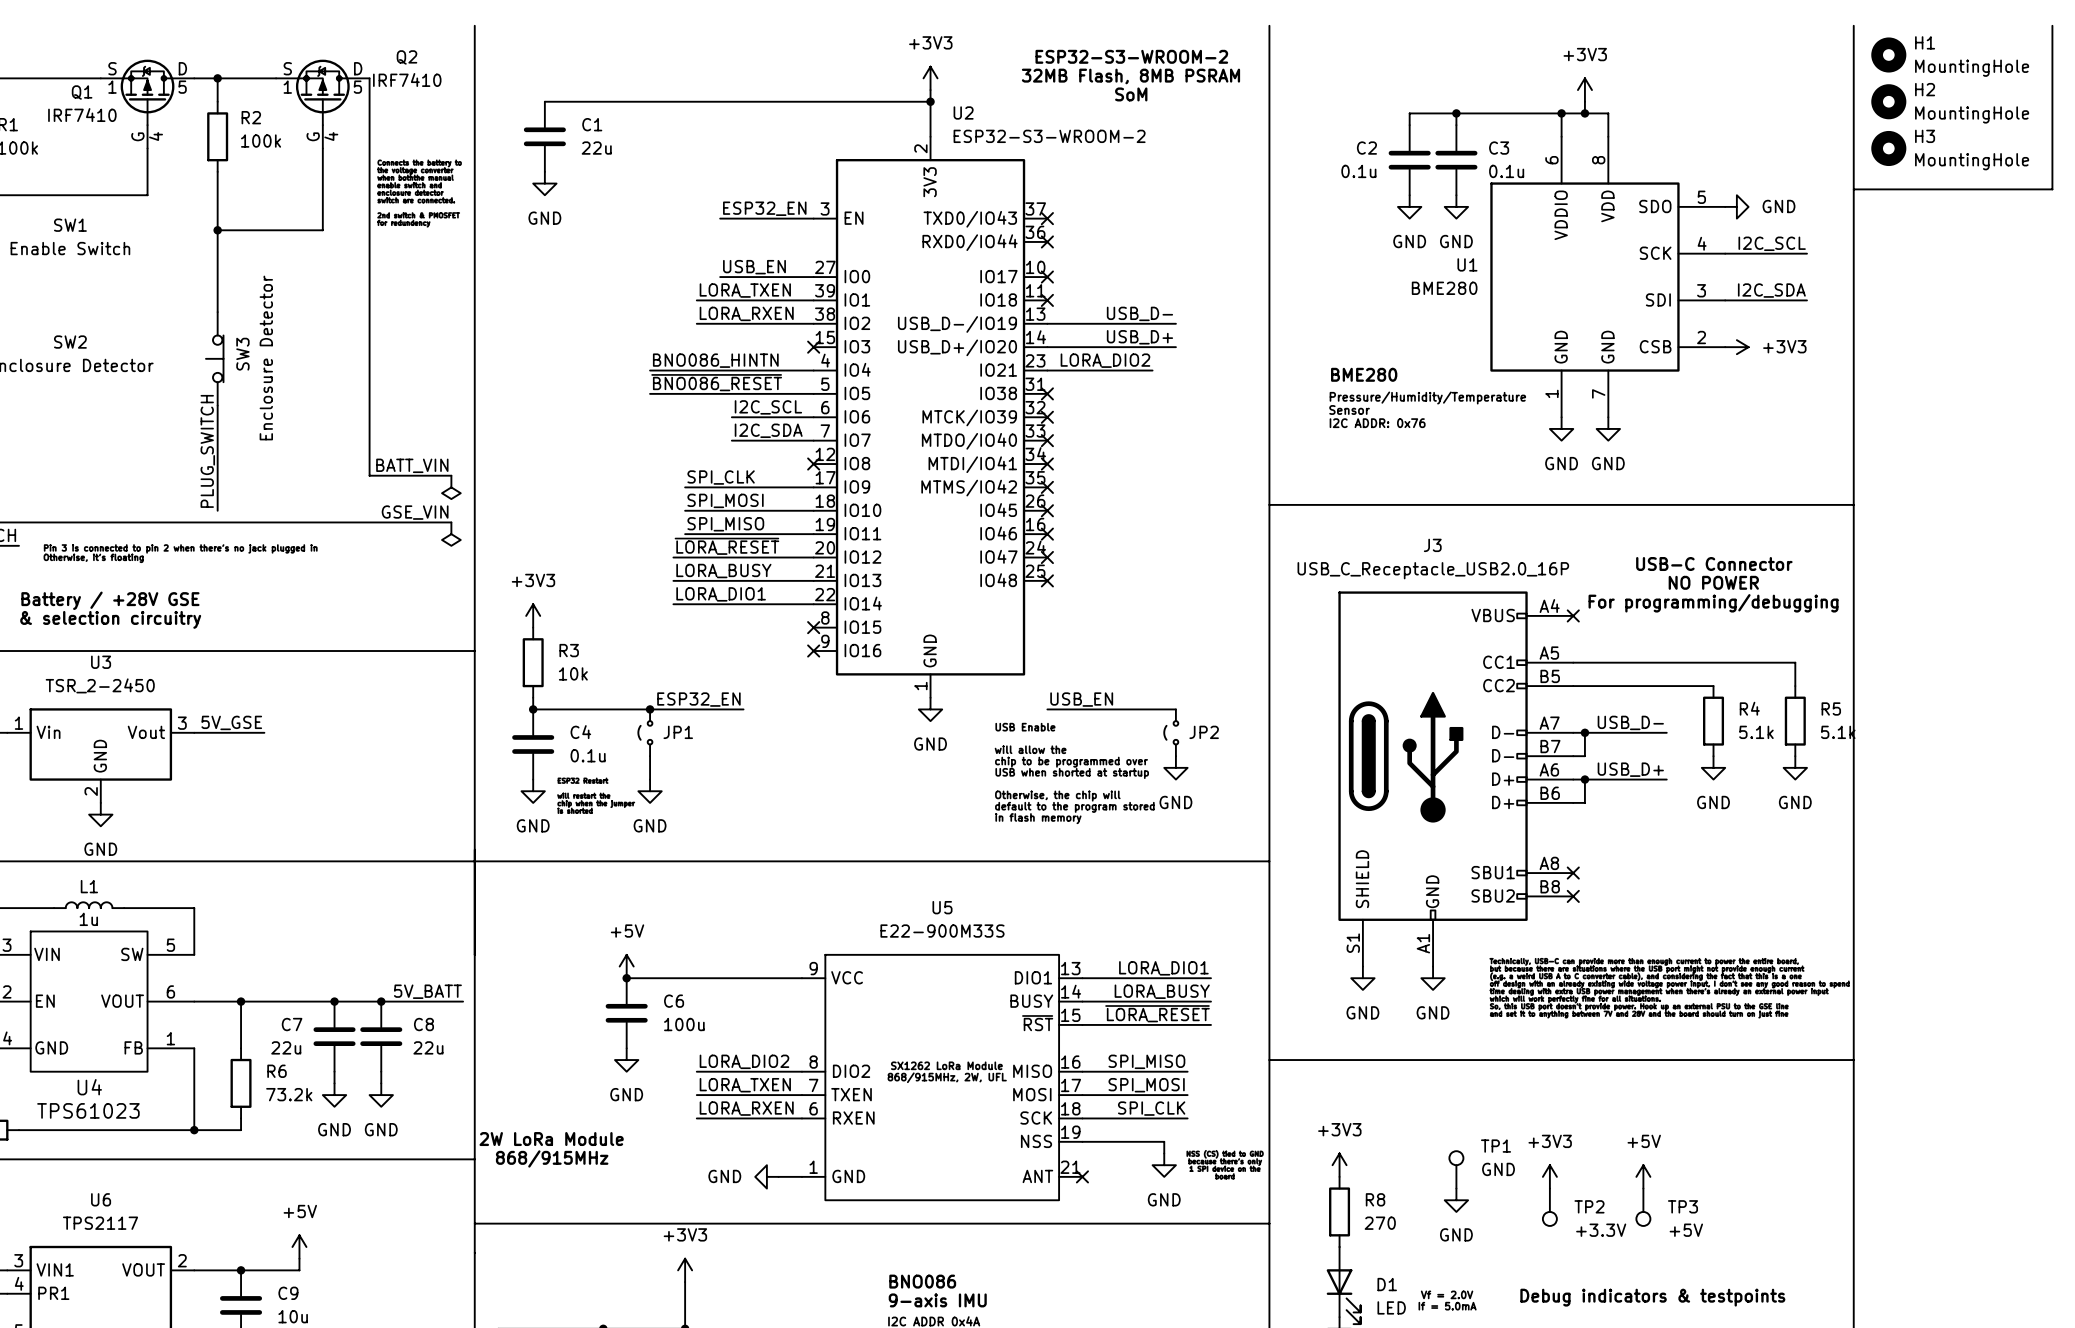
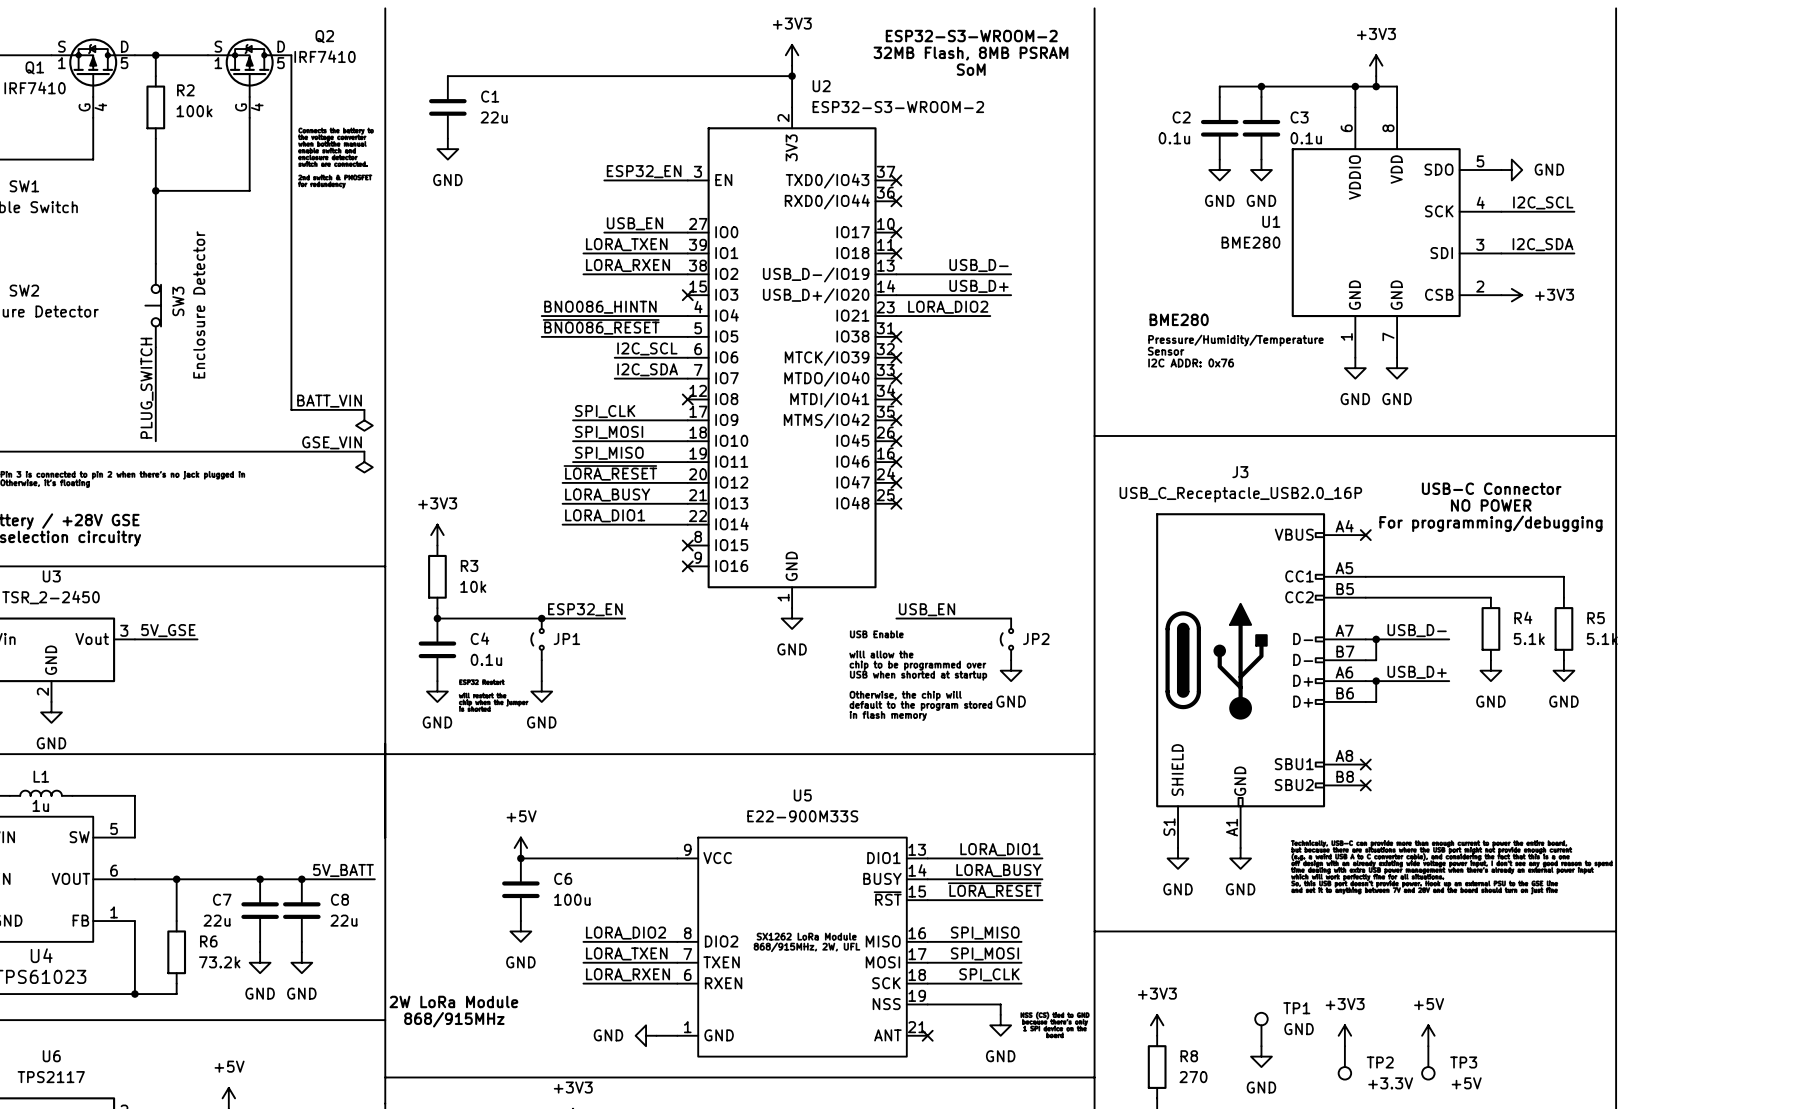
line: (2052, 25) (2052, 189) (1853, 189) -> none
H1: MountingHole (1888, 55) -> none
H2: MountingHole (1888, 101) -> none
H3: MountingHole (1888, 148) -> none

